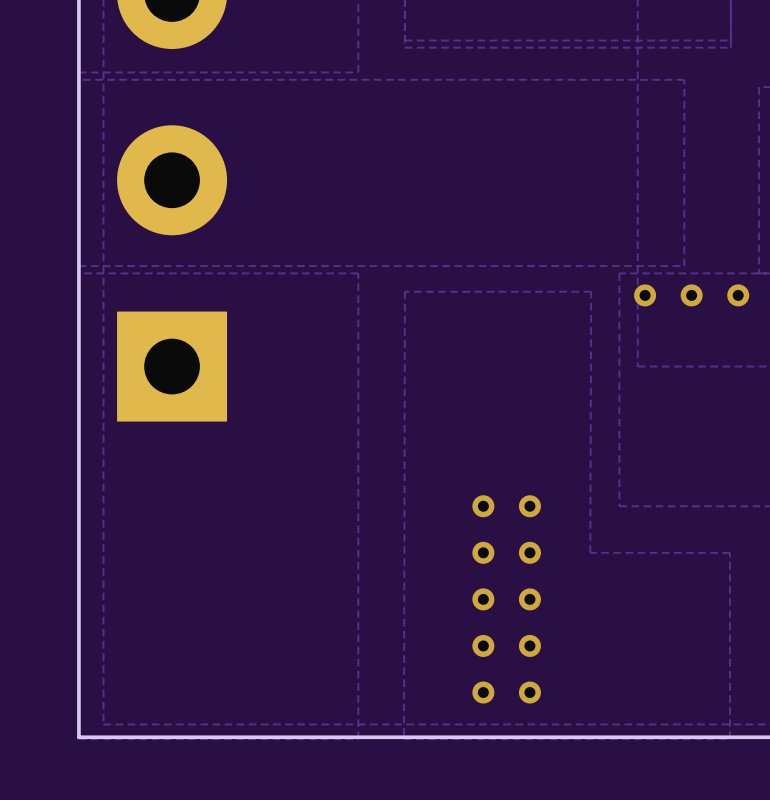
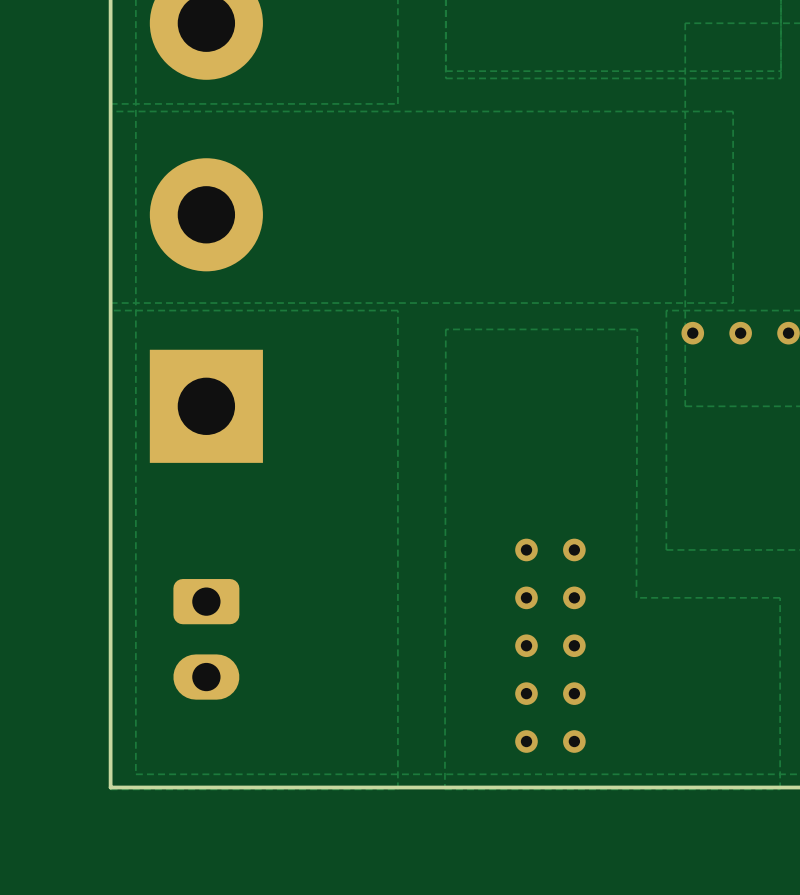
part: none -> (206, 639)

